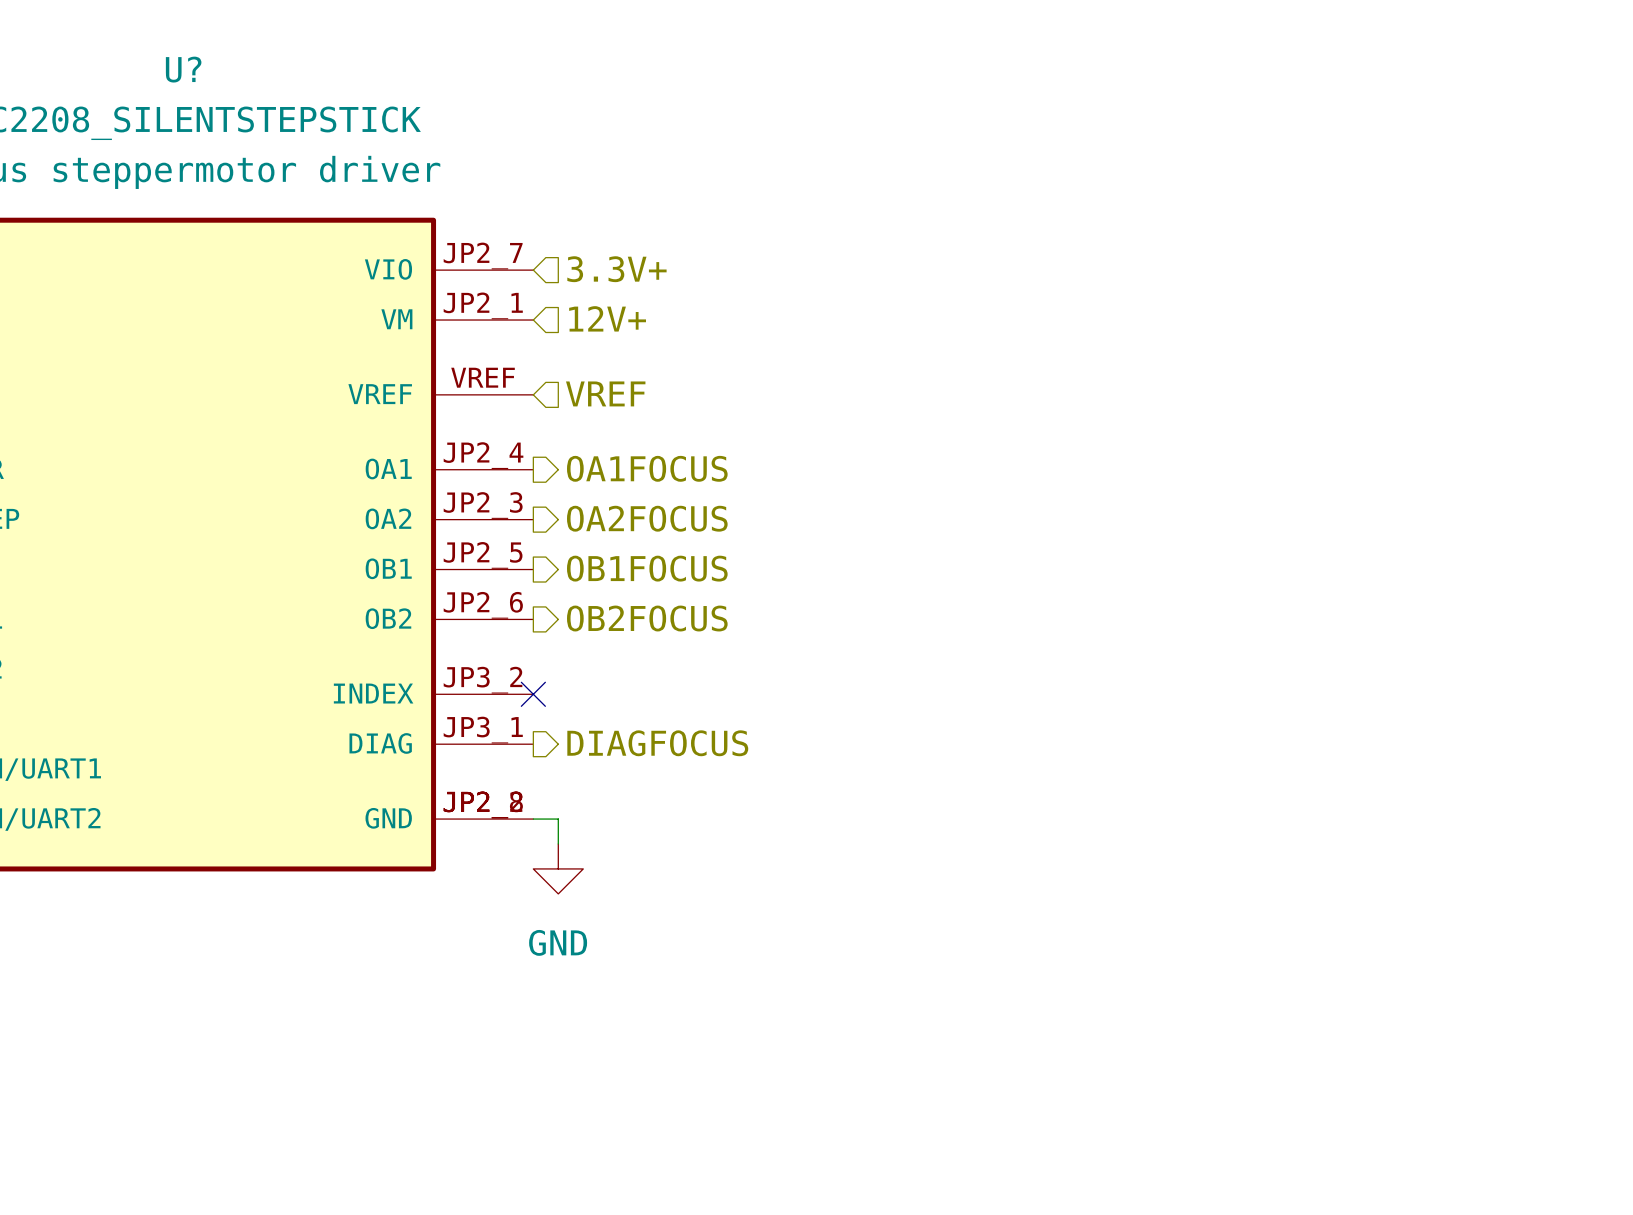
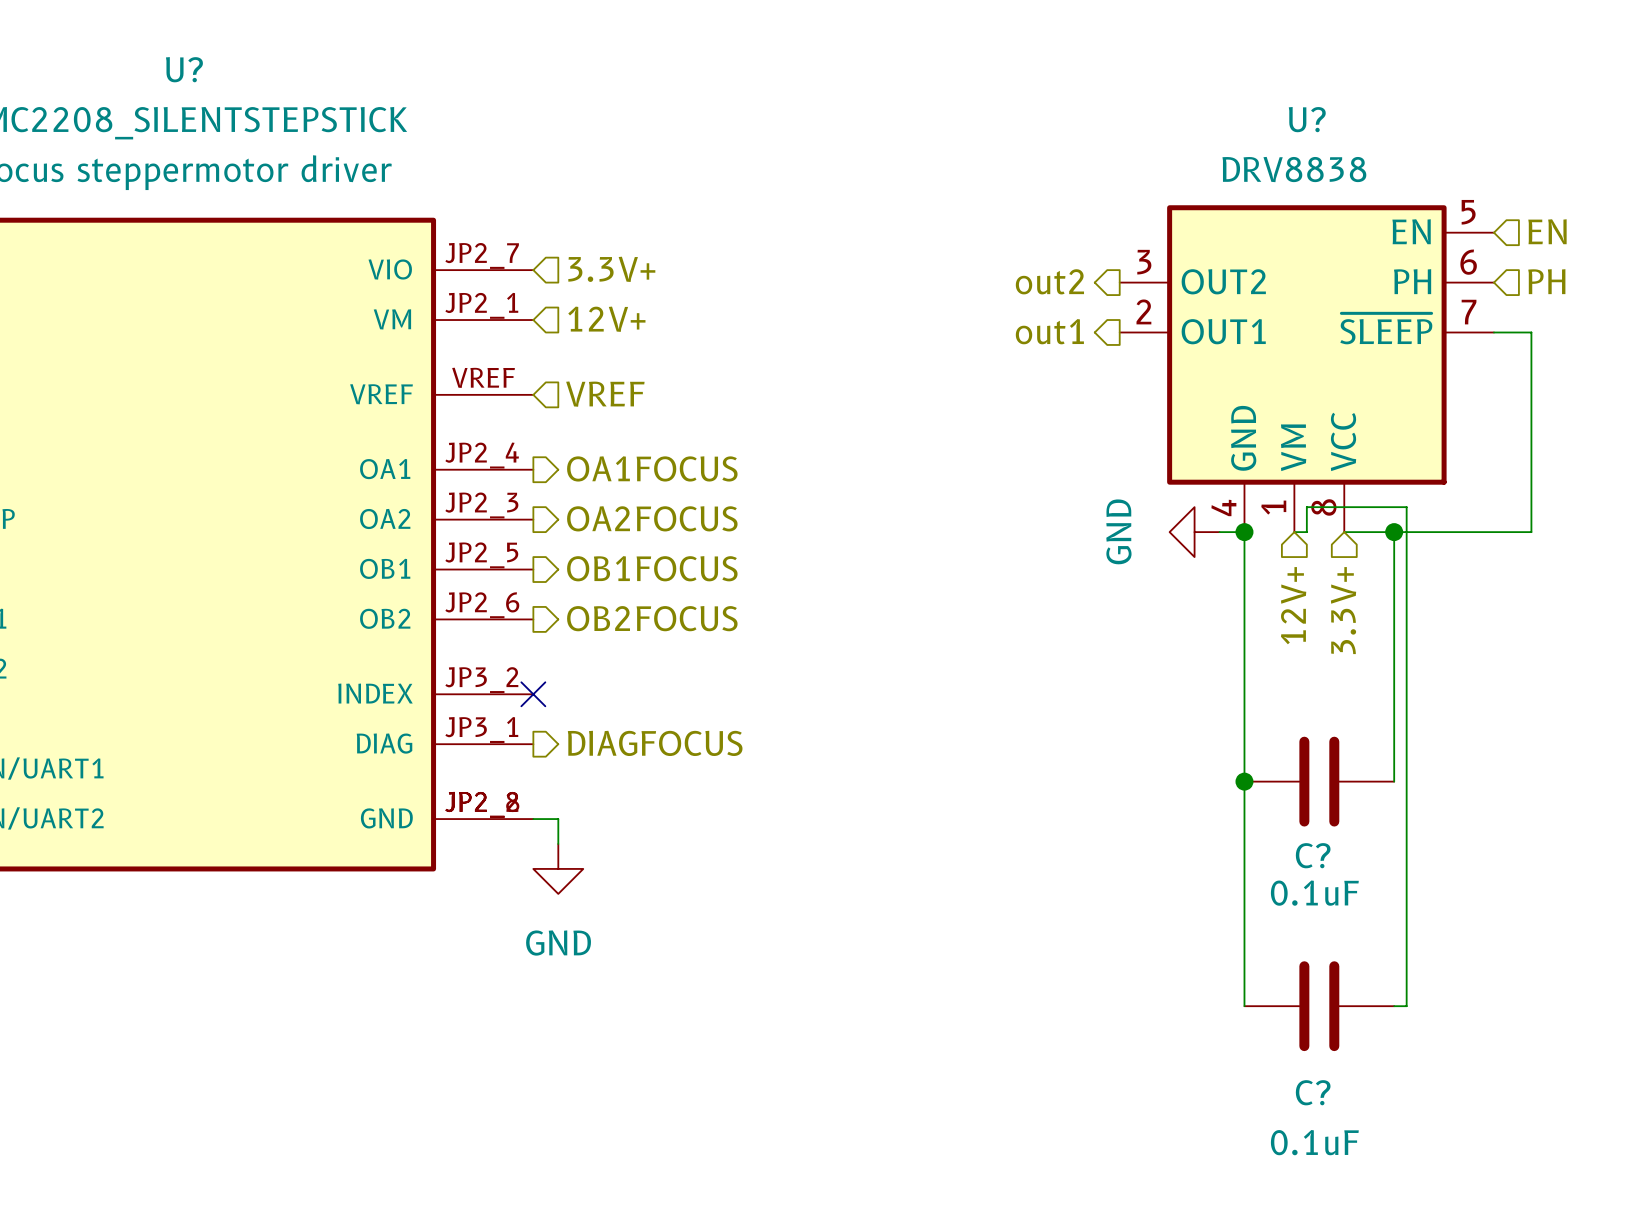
hierarchical label: none -> EN (1547, 231)
hierarchical label: none -> out2 (1049, 281)
hierarchical label: none -> PH (1546, 281)
hierarchical label: none -> out1 (1049, 331)
wire: none -> (1493, 332) (1531, 332) (1531, 532) (1344, 532)
U?: none -> DRV8838 (1306, 368)
power symbol: none -> GND (1194, 532)
wire: none -> (1219, 532) (1244, 532) (1244, 1006)
junction: none -> (1244, 532)
wire: none -> (1294, 532) (1306, 532) (1306, 507) (1406, 507) (1406, 1006) (1394, 1006)
wire: none -> (1394, 532) (1394, 781)
junction: none -> (1394, 532)
hierarchical label: none -> 12V+ (1293, 605)
hierarchical label: none -> 3.3V+ (1343, 610)
junction: none -> (1244, 781)
C?: none -> 0.1uF (1319, 781)
C?: none -> 0.1uF (1319, 1006)

